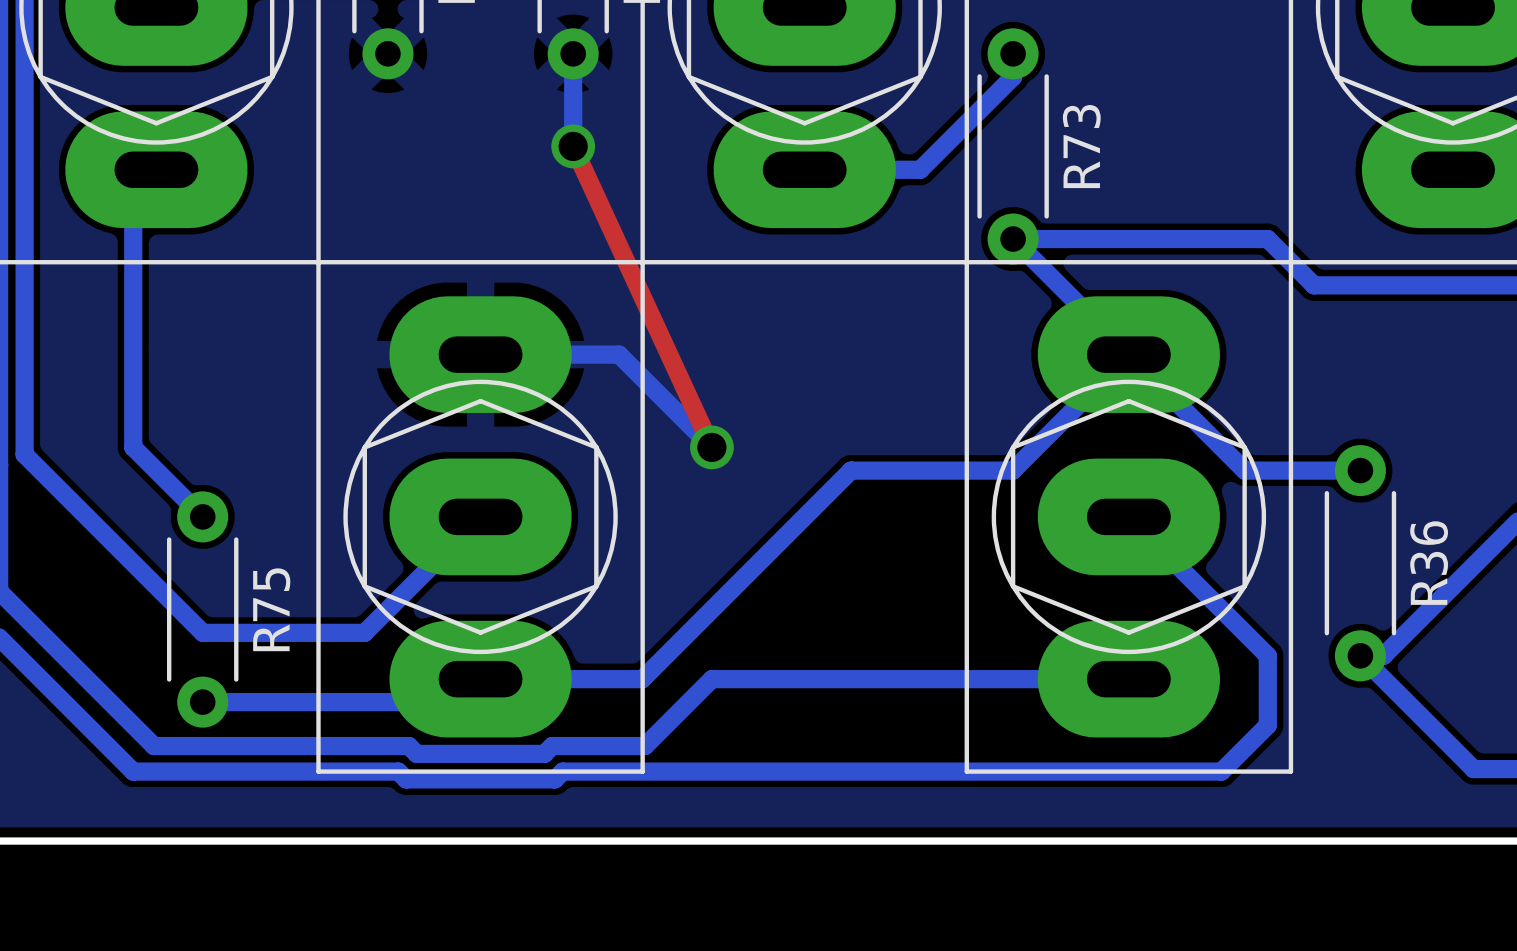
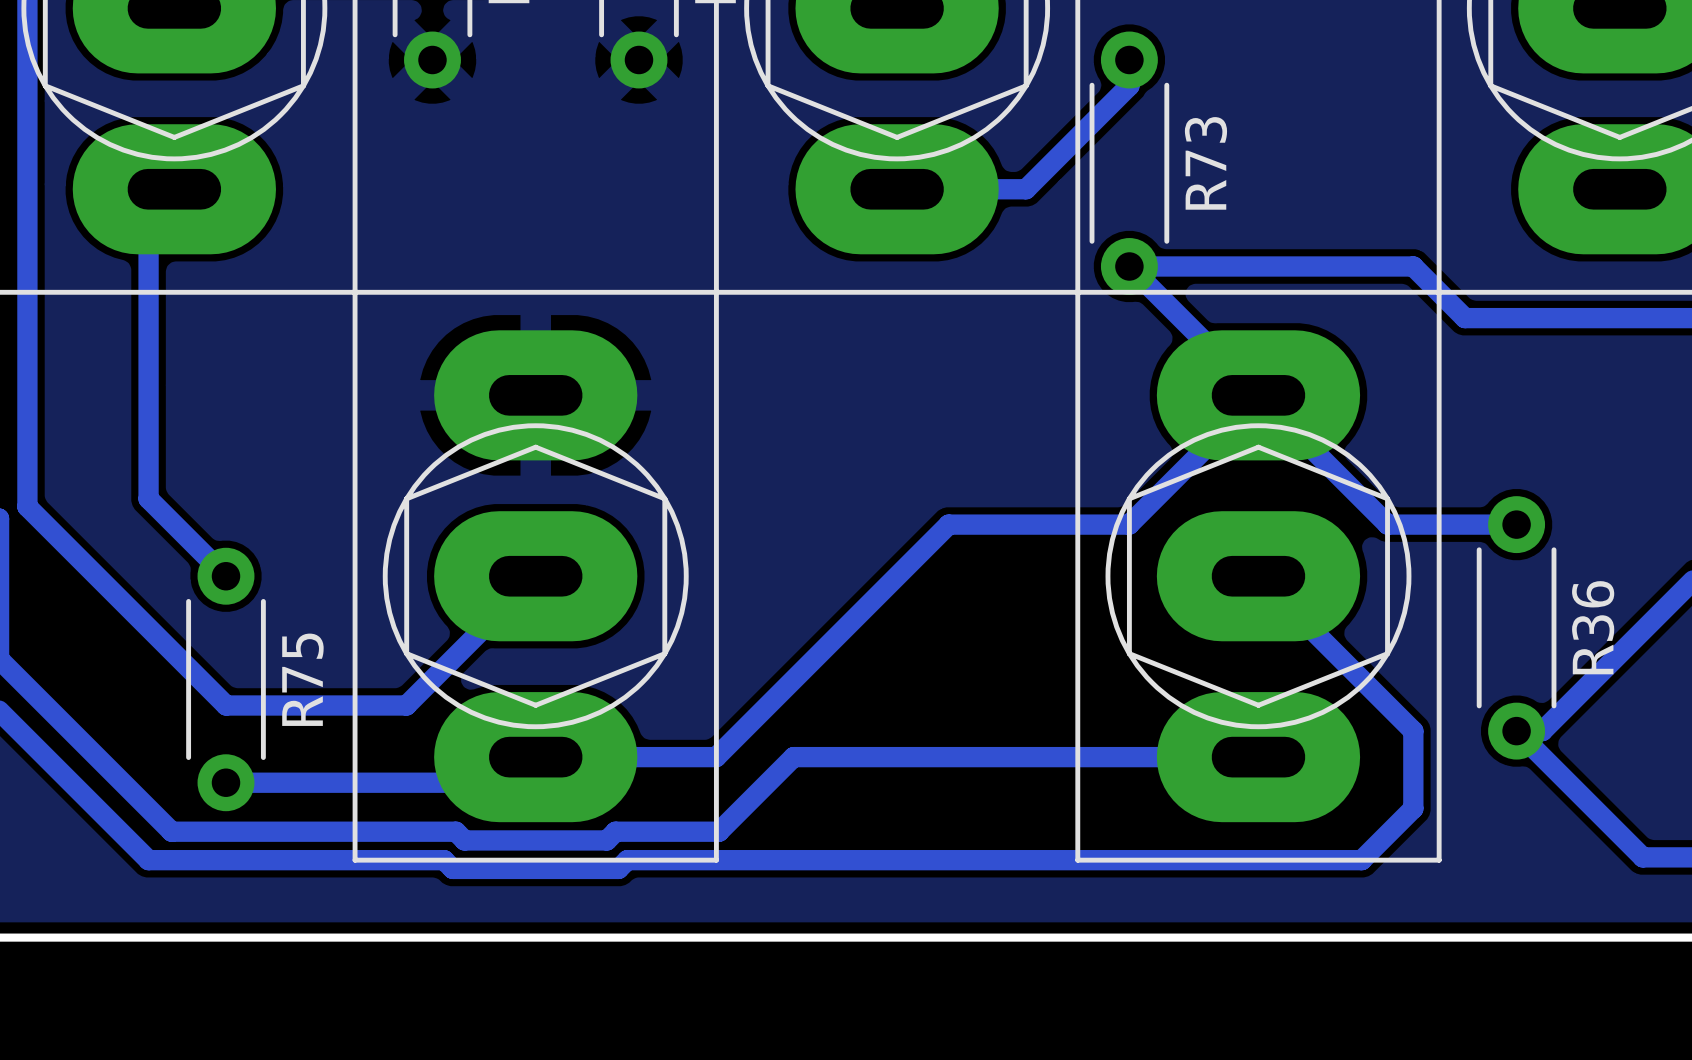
bottom track: (573, 53) (573, 146) -> none
top track: (573, 146) (711, 447) -> none
via: (573, 146) -> none
bottom track: (480, 354) (619, 354) (711, 447) -> none
via: (711, 447) -> none

